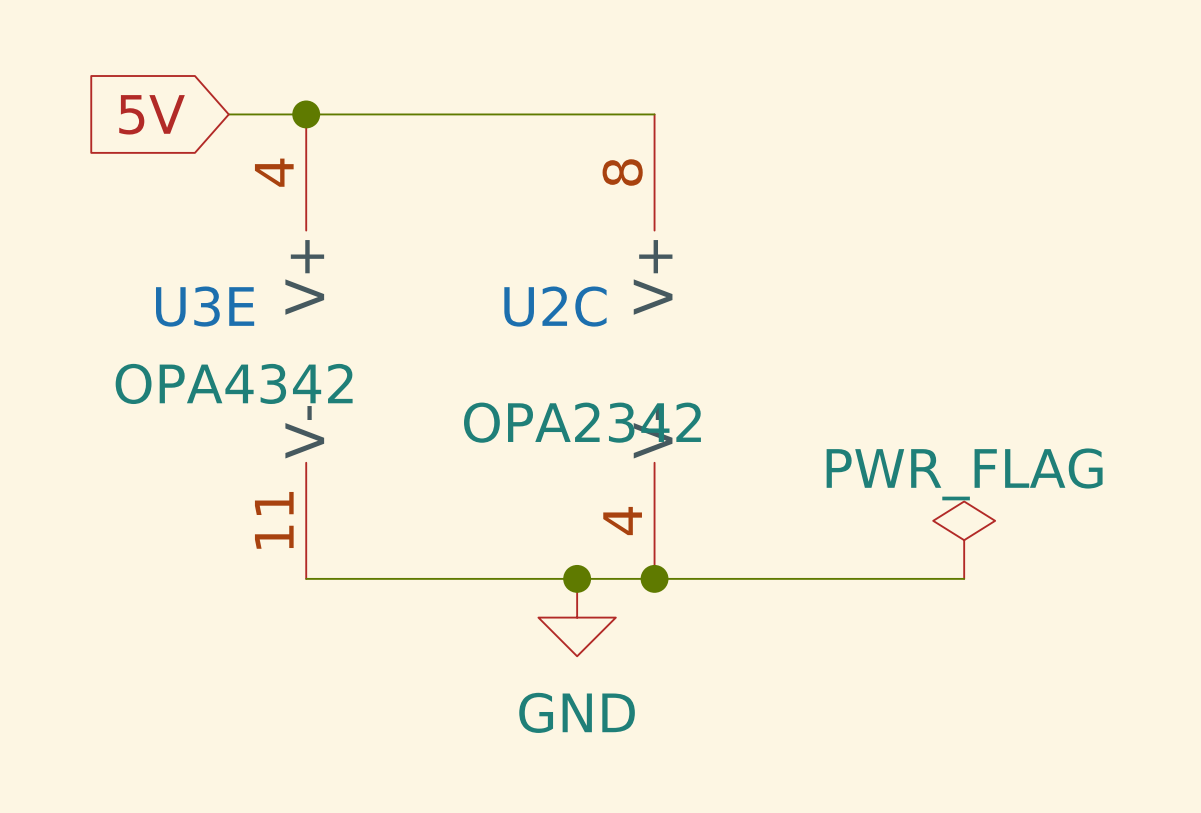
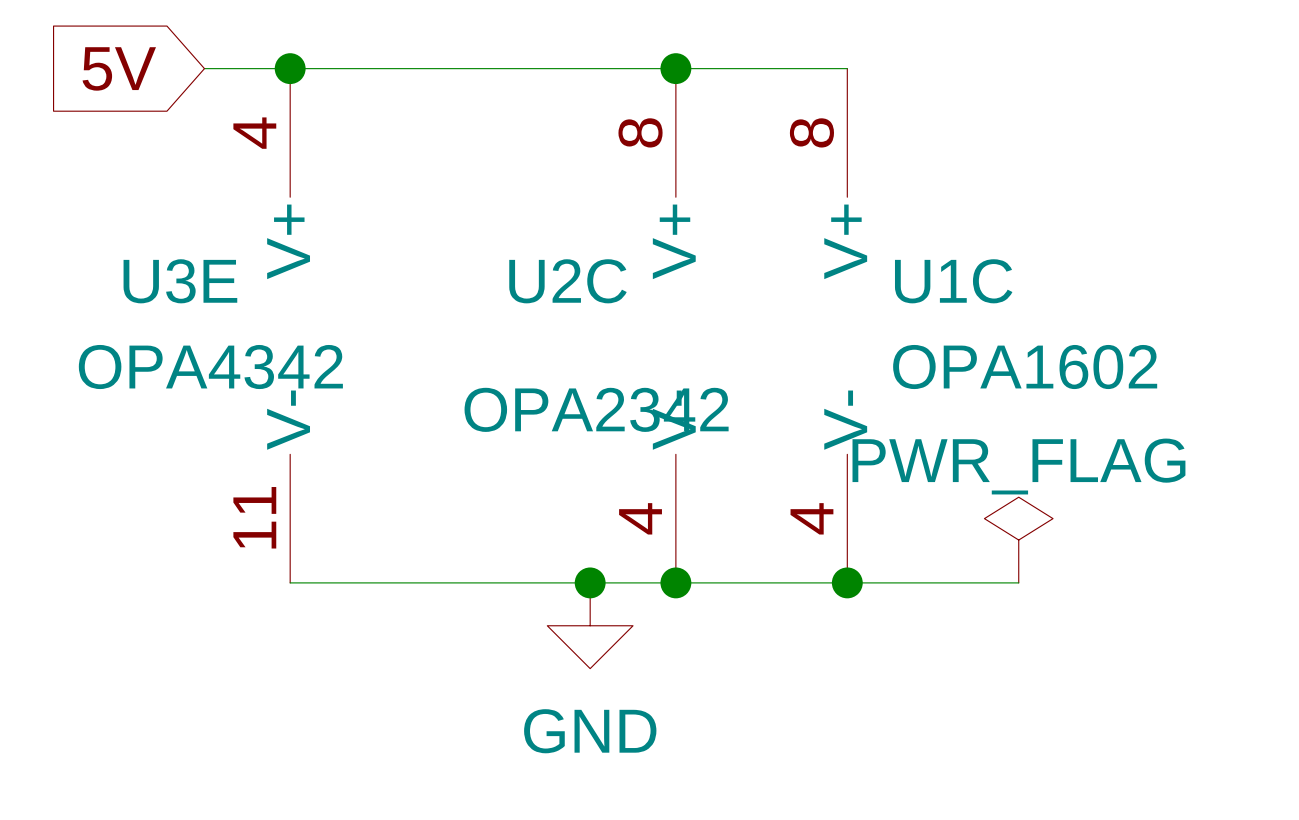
wire: none -> (675, 68) (847, 68)
junction: none -> (675, 68)
U1C: none -> OPA1602 (847, 325)
junction: none -> (847, 582)

